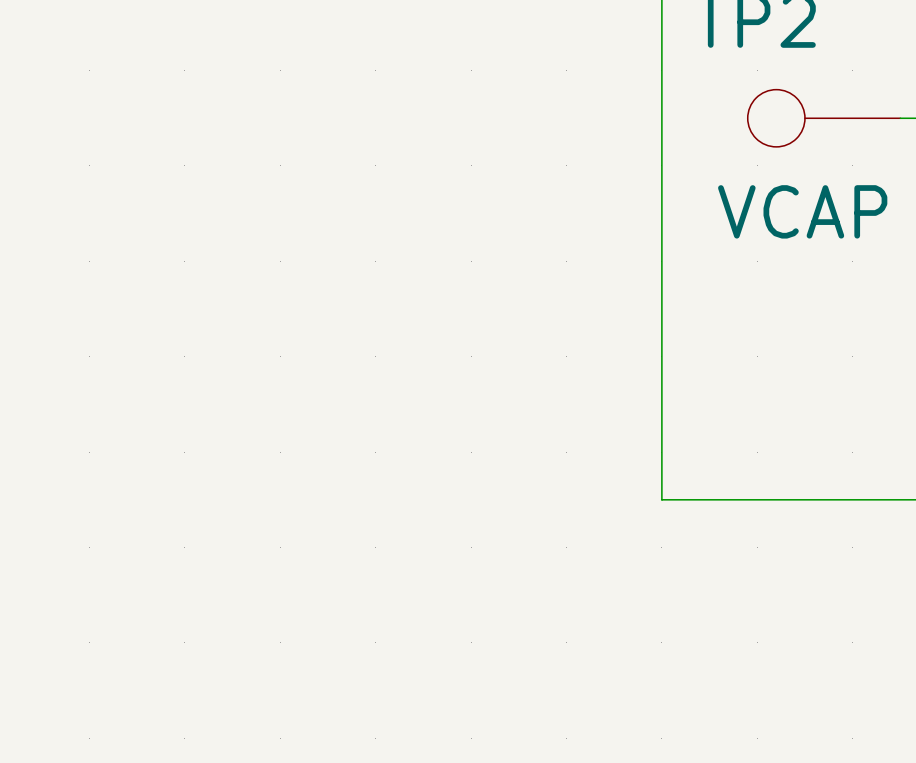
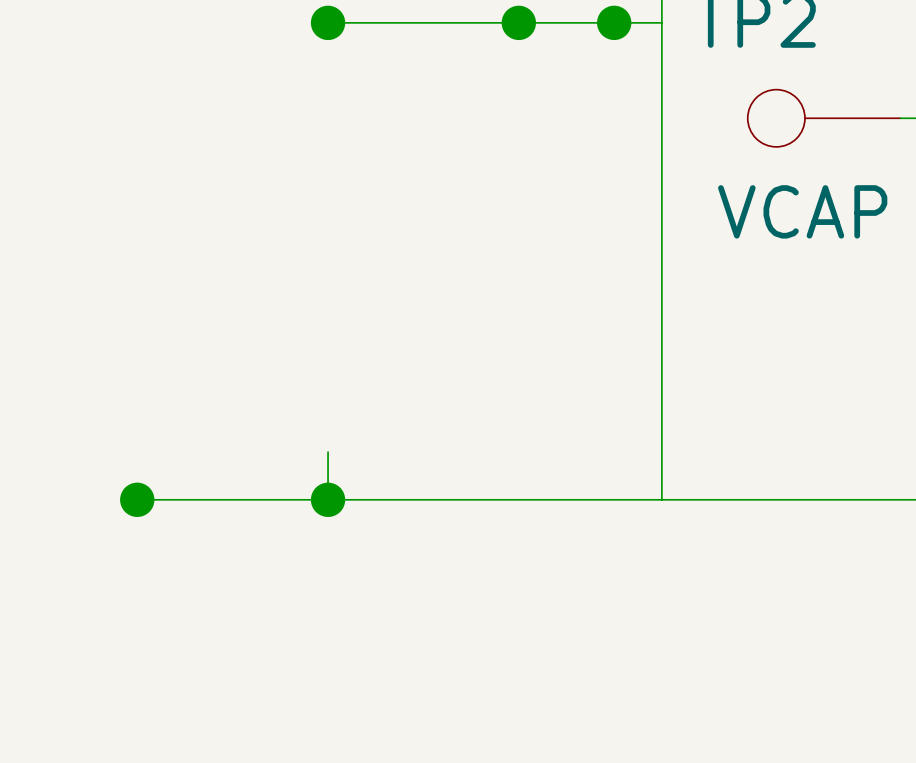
wire: none -> (328, 22) (661, 22)
junction: none -> (328, 22)
junction: none -> (518, 22)
junction: none -> (614, 22)
wire: none -> (328, 452) (328, 499)
wire: none -> (137, 499) (661, 499)
junction: none -> (137, 499)
junction: none -> (328, 499)

